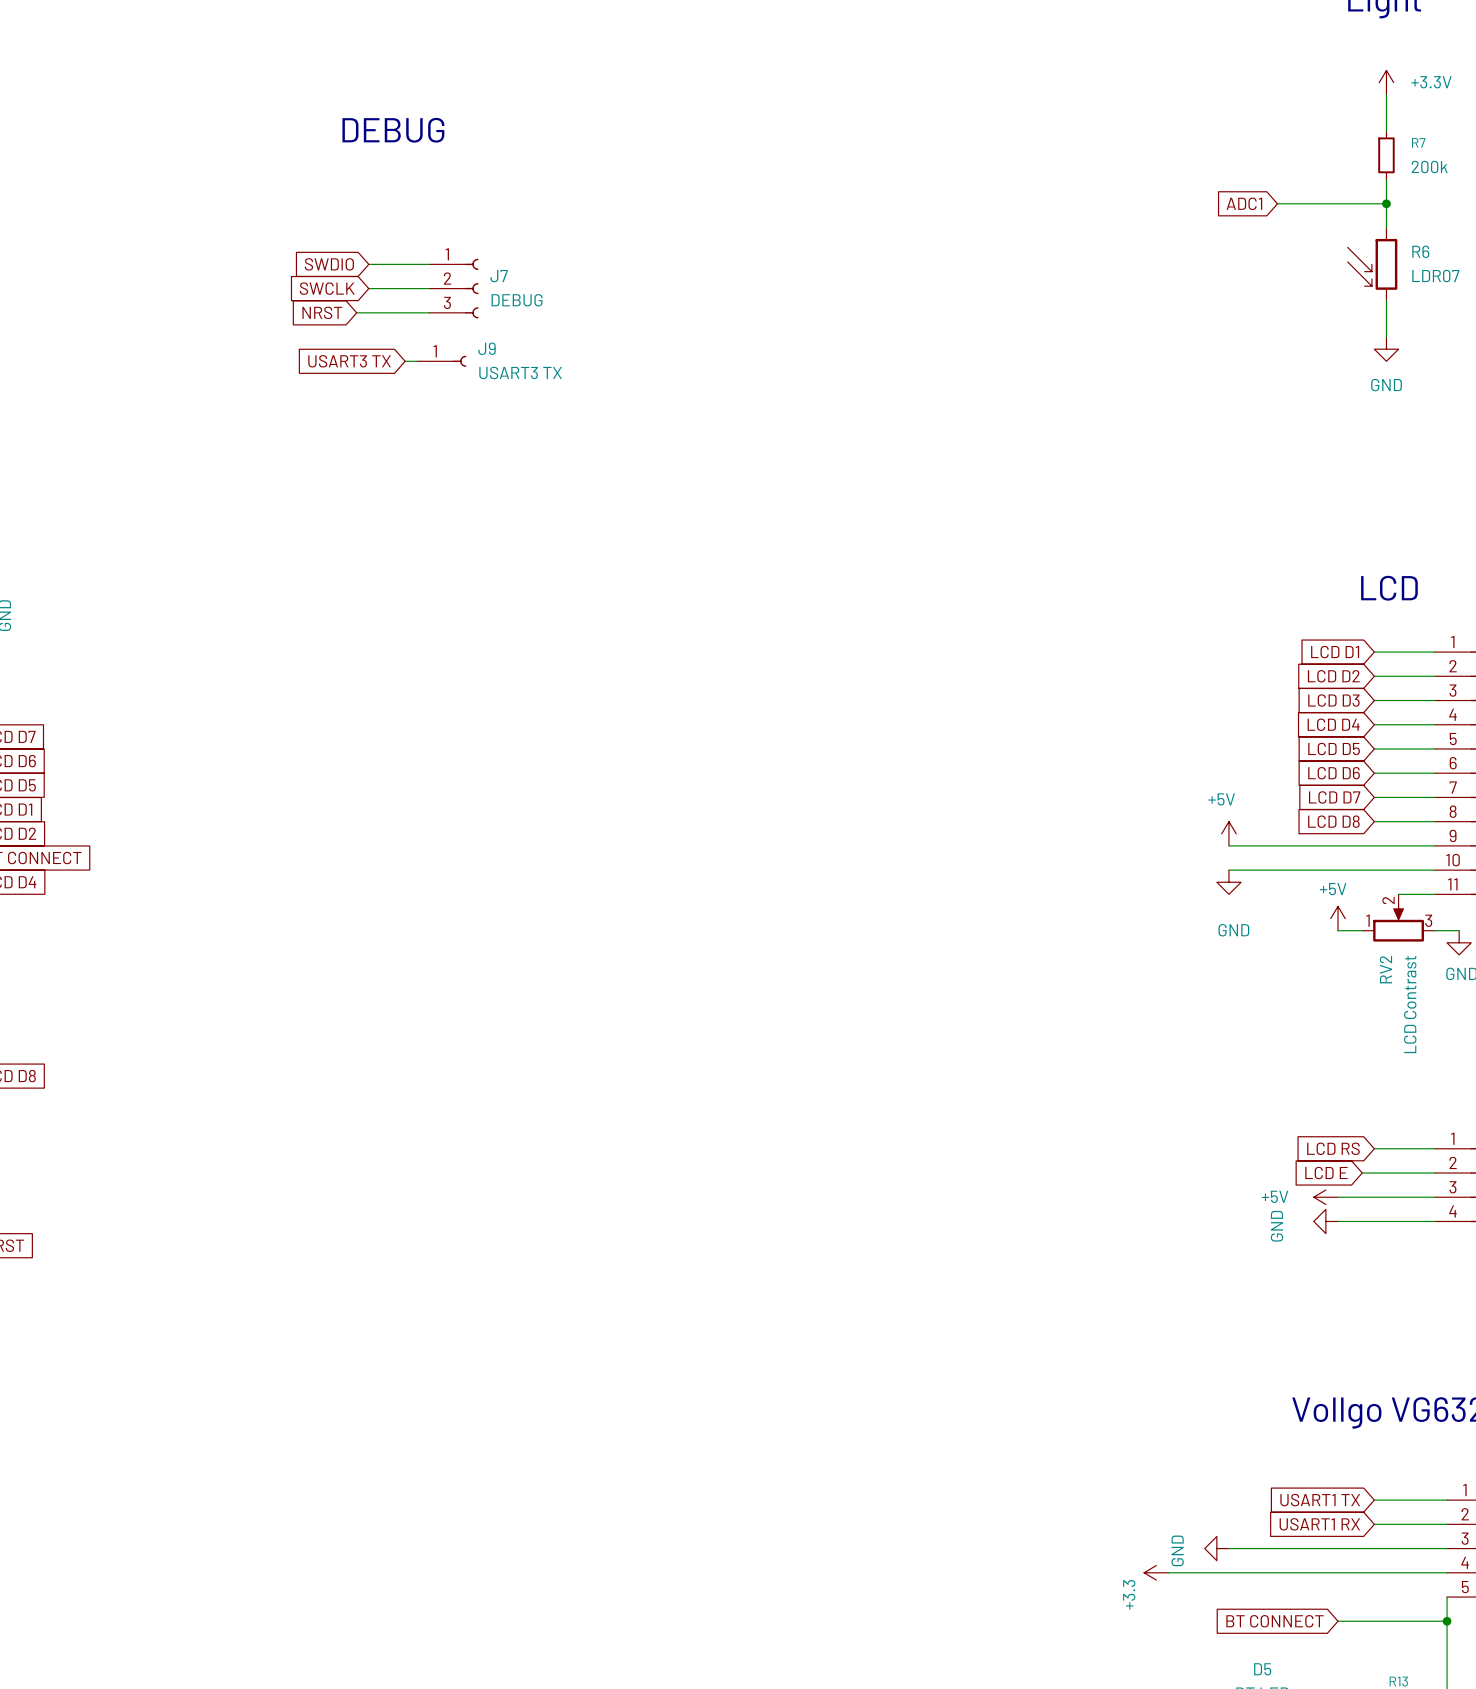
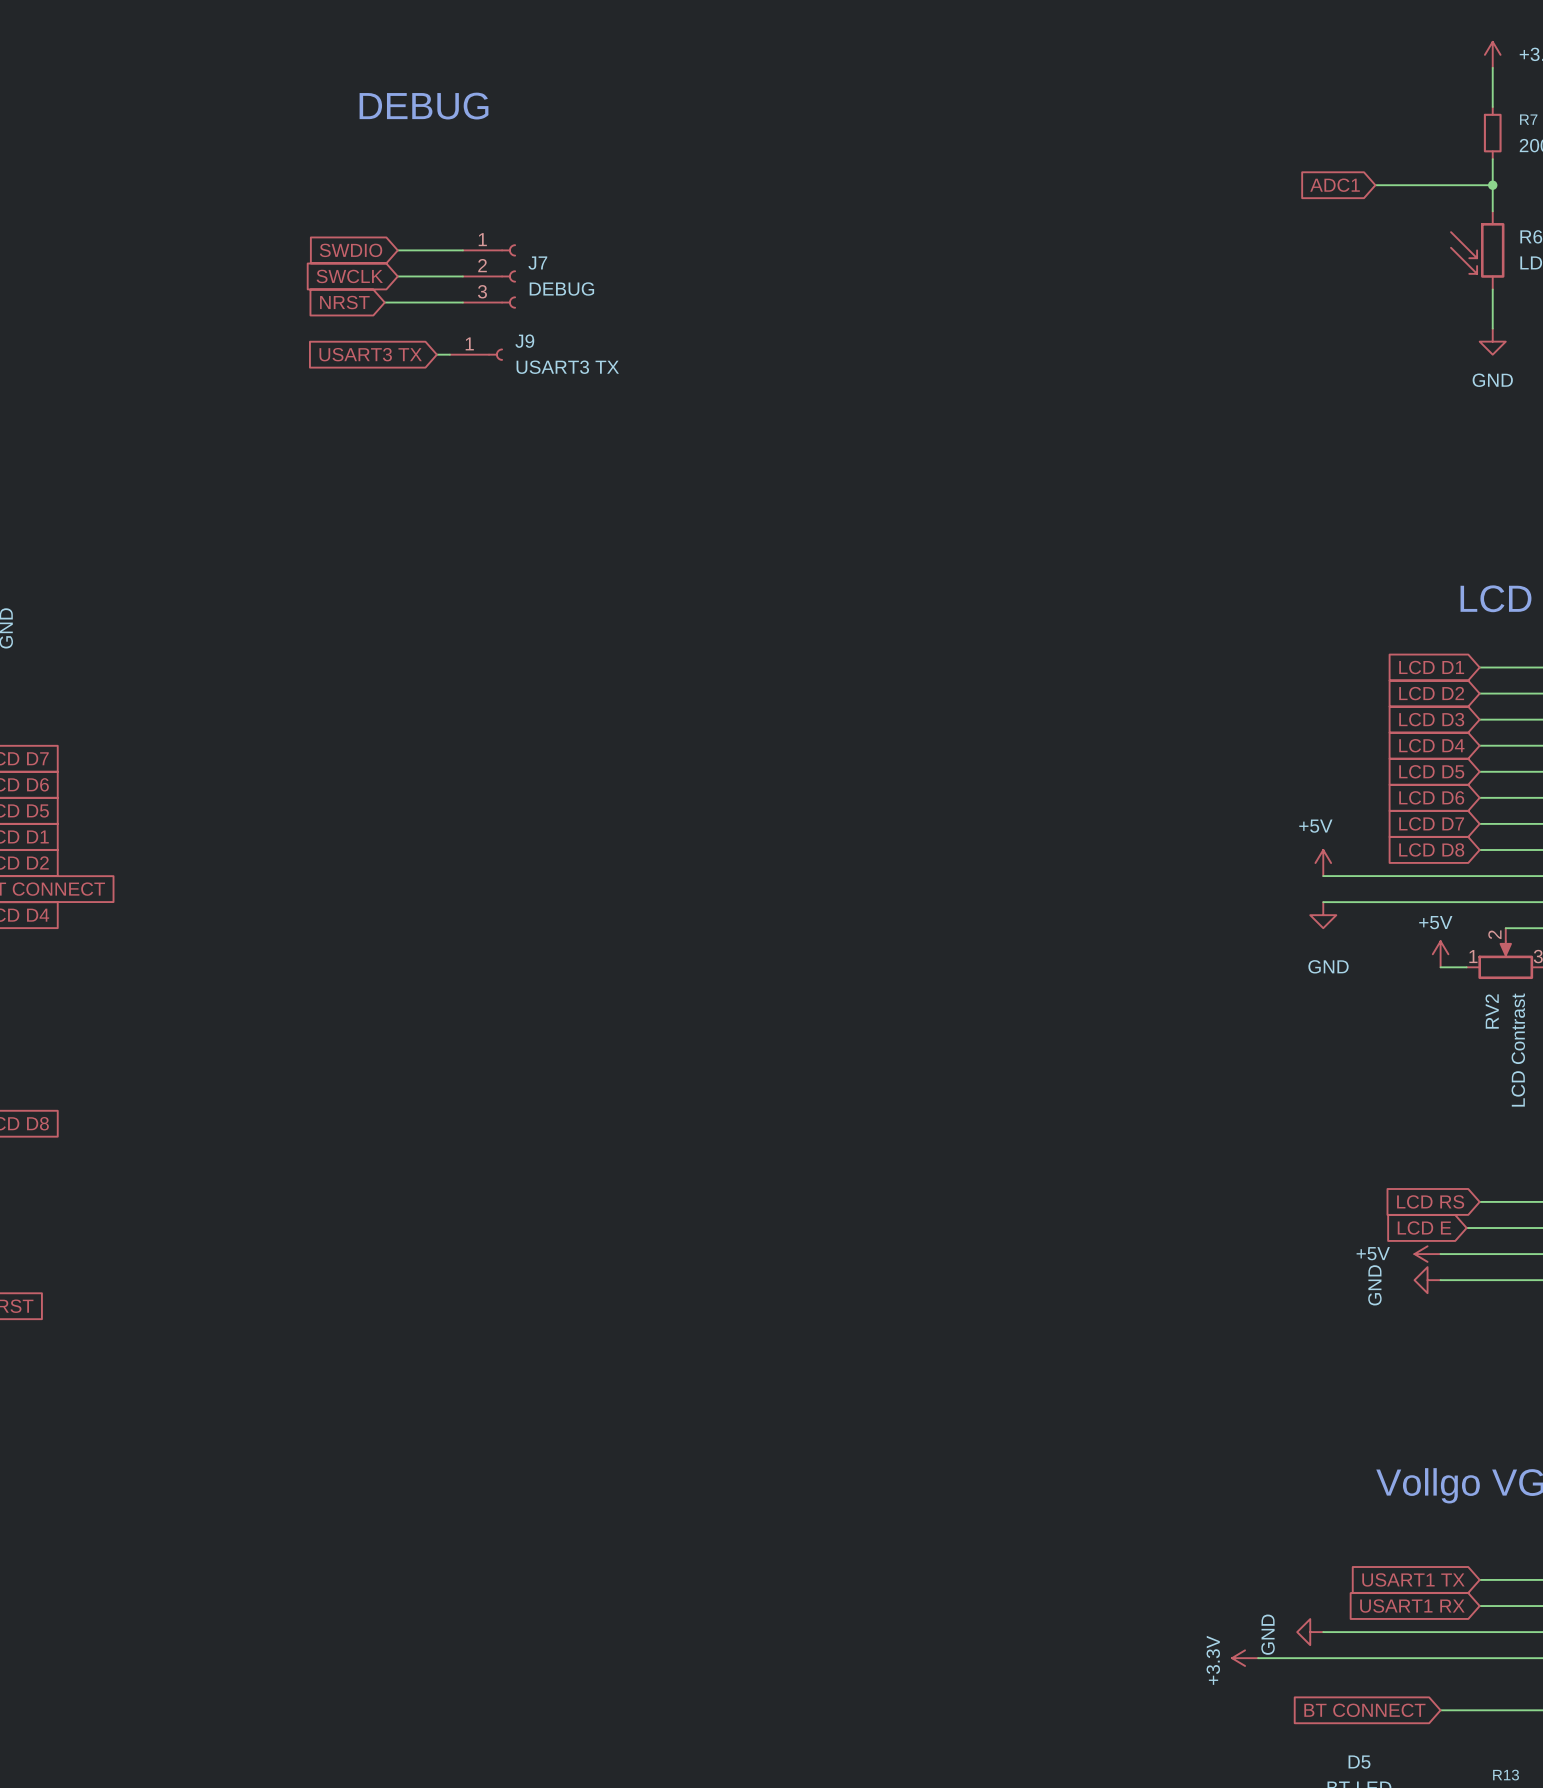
power symbol: +3.3 (1156, 1572) -> +3.3V (1245, 1658)

